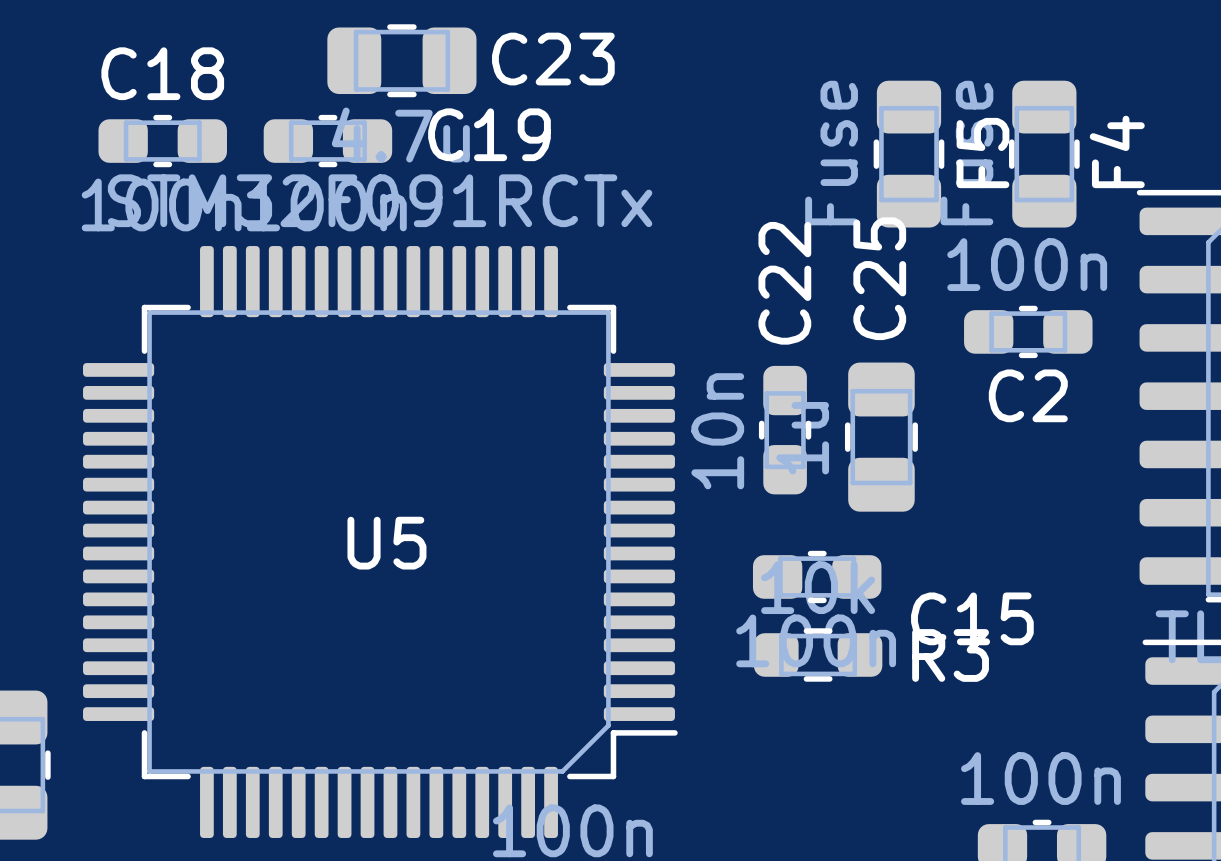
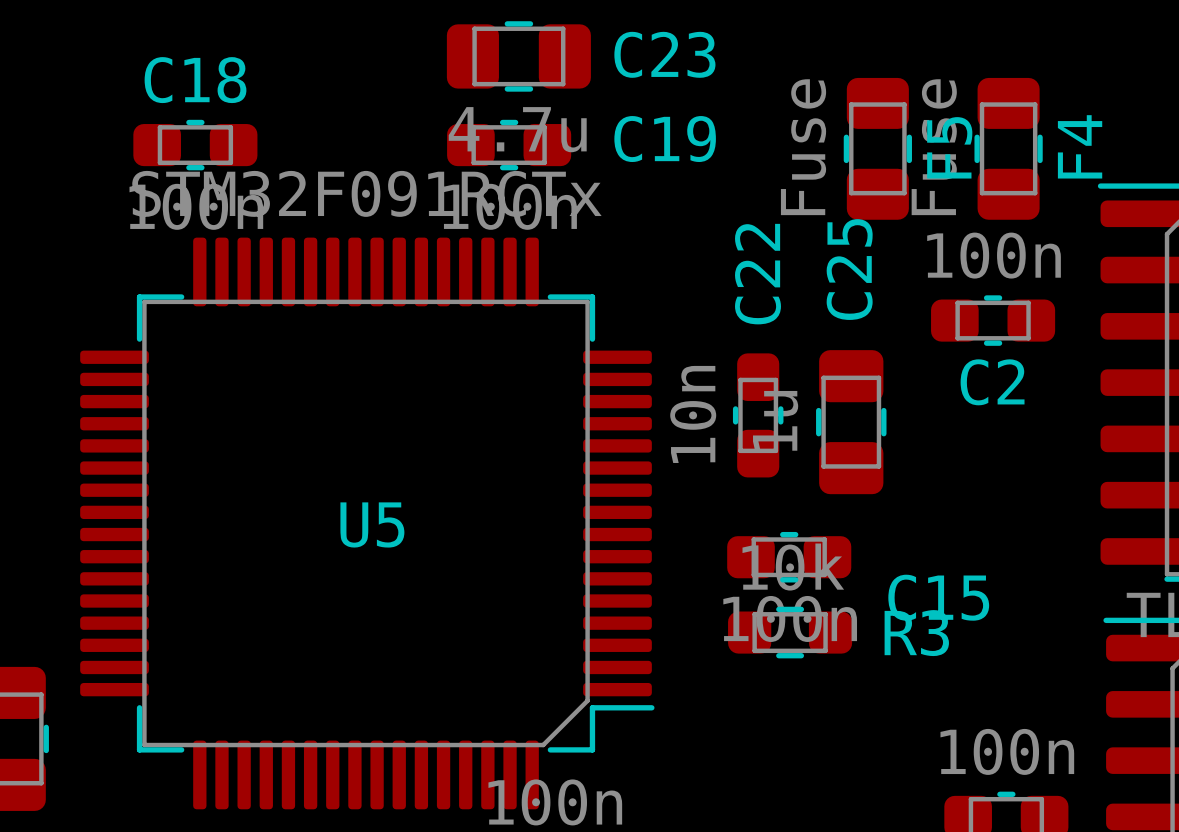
C23 position: (401, 60) -> (518, 56)
C18 position: (162, 141) -> (195, 145)
C19 position: (327, 141) -> (509, 145)

